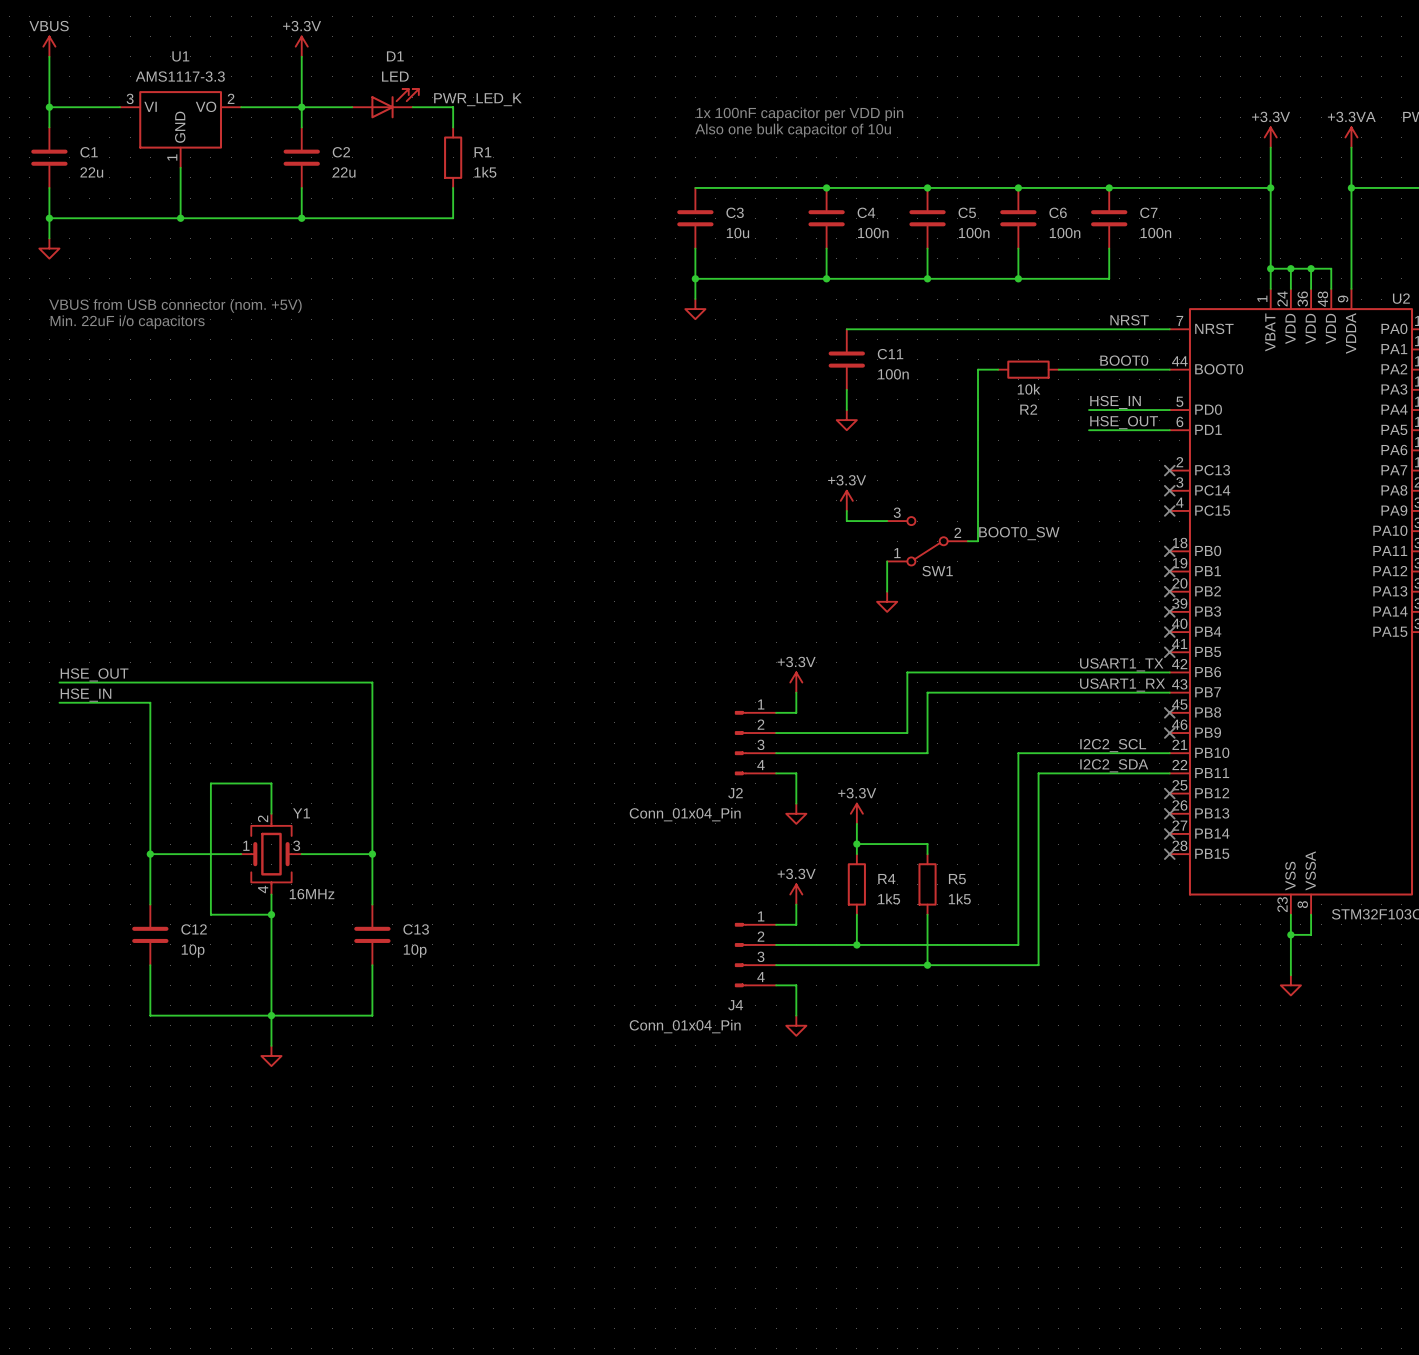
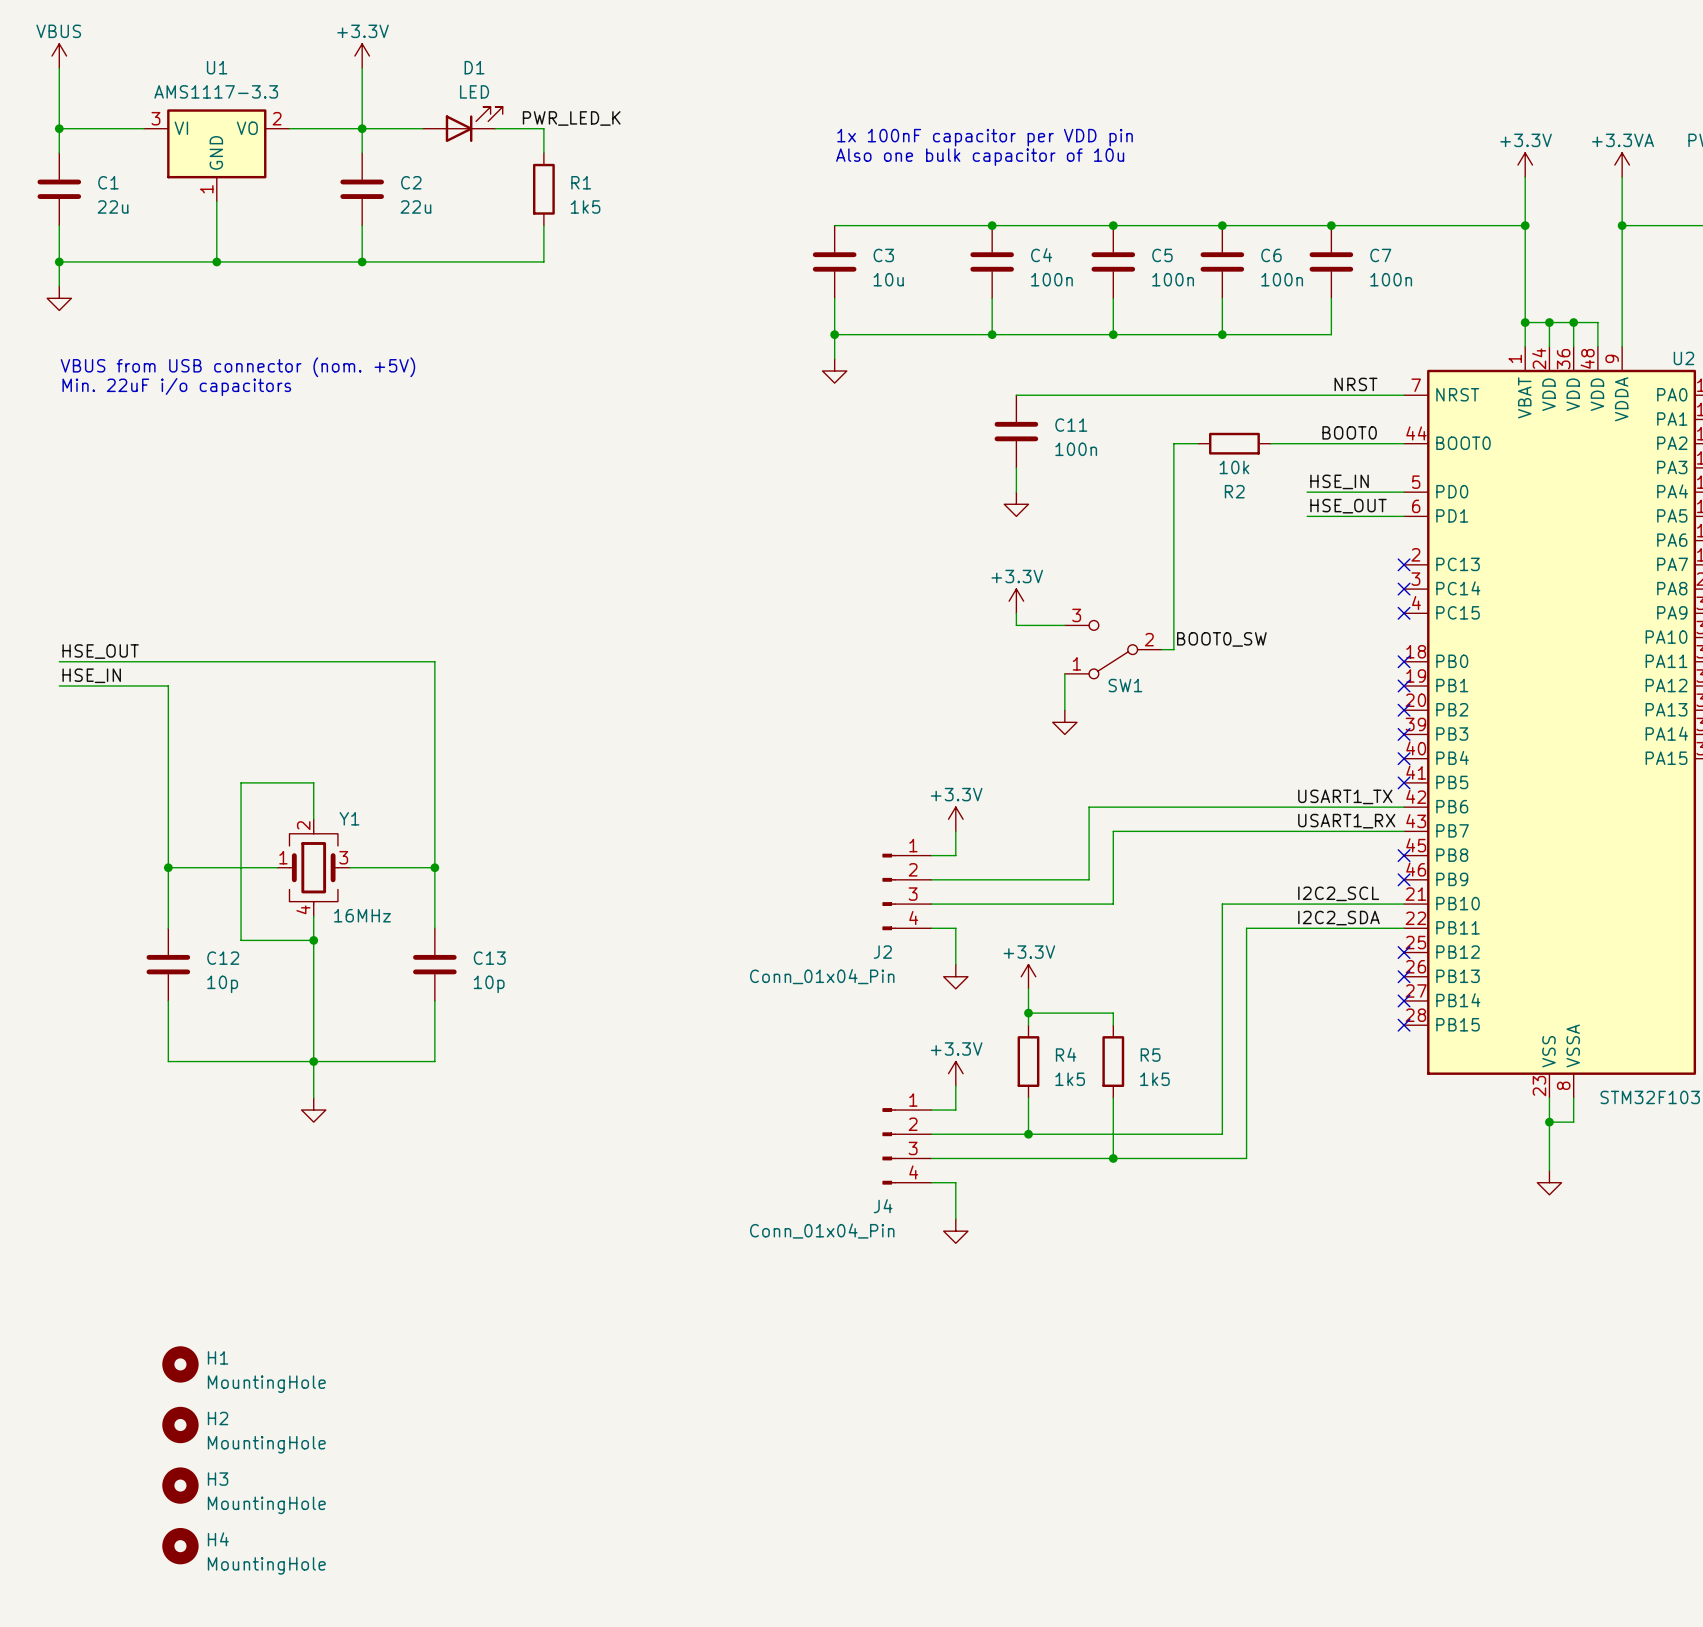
label position: HSE_OUT (94, 674) -> HSE_OUT (100, 651)
wire: (59, 682) (372, 682) (372, 904) -> (59, 661) (434, 661) (434, 928)
label position: HSE_IN (86, 695) -> HSE_IN (91, 675)
wire: (59, 702) (150, 702) (150, 904) -> (59, 685) (168, 685) (168, 928)
junction: none -> (168, 867)
junction: none -> (434, 867)
wire: (210, 783) (210, 914) (271, 914) -> (253, 940) (241, 940) (241, 782) (313, 782) (313, 819)
wire: (261, 783) (271, 783) (271, 813) -> none
junction: none -> (313, 940)
wire: (150, 854) (241, 854) -> (168, 867) (277, 867)
junction: (150, 854) -> none
Y1 position: (271, 854) -> (313, 867)
wire: (301, 854) (372, 854) -> (350, 867) (434, 867)
junction: (372, 854) -> none
wire: (271, 894) (271, 1045) -> (313, 916) (313, 1097)
junction position: (271, 914) -> (313, 1061)
C12 position: (150, 934) -> (168, 964)
C13 position: (372, 934) -> (434, 964)
wire: (150, 965) (150, 1015) (372, 1015) (372, 965) -> (168, 1000) (168, 1061) (434, 1061) (434, 1000)
junction: (271, 1015) -> none
power symbol position: (271, 1056) -> (313, 1110)
H1: none -> MountingHole (180, 1364)
H2: none -> MountingHole (180, 1425)
H3: none -> MountingHole (180, 1485)
H4: none -> MountingHole (180, 1546)

